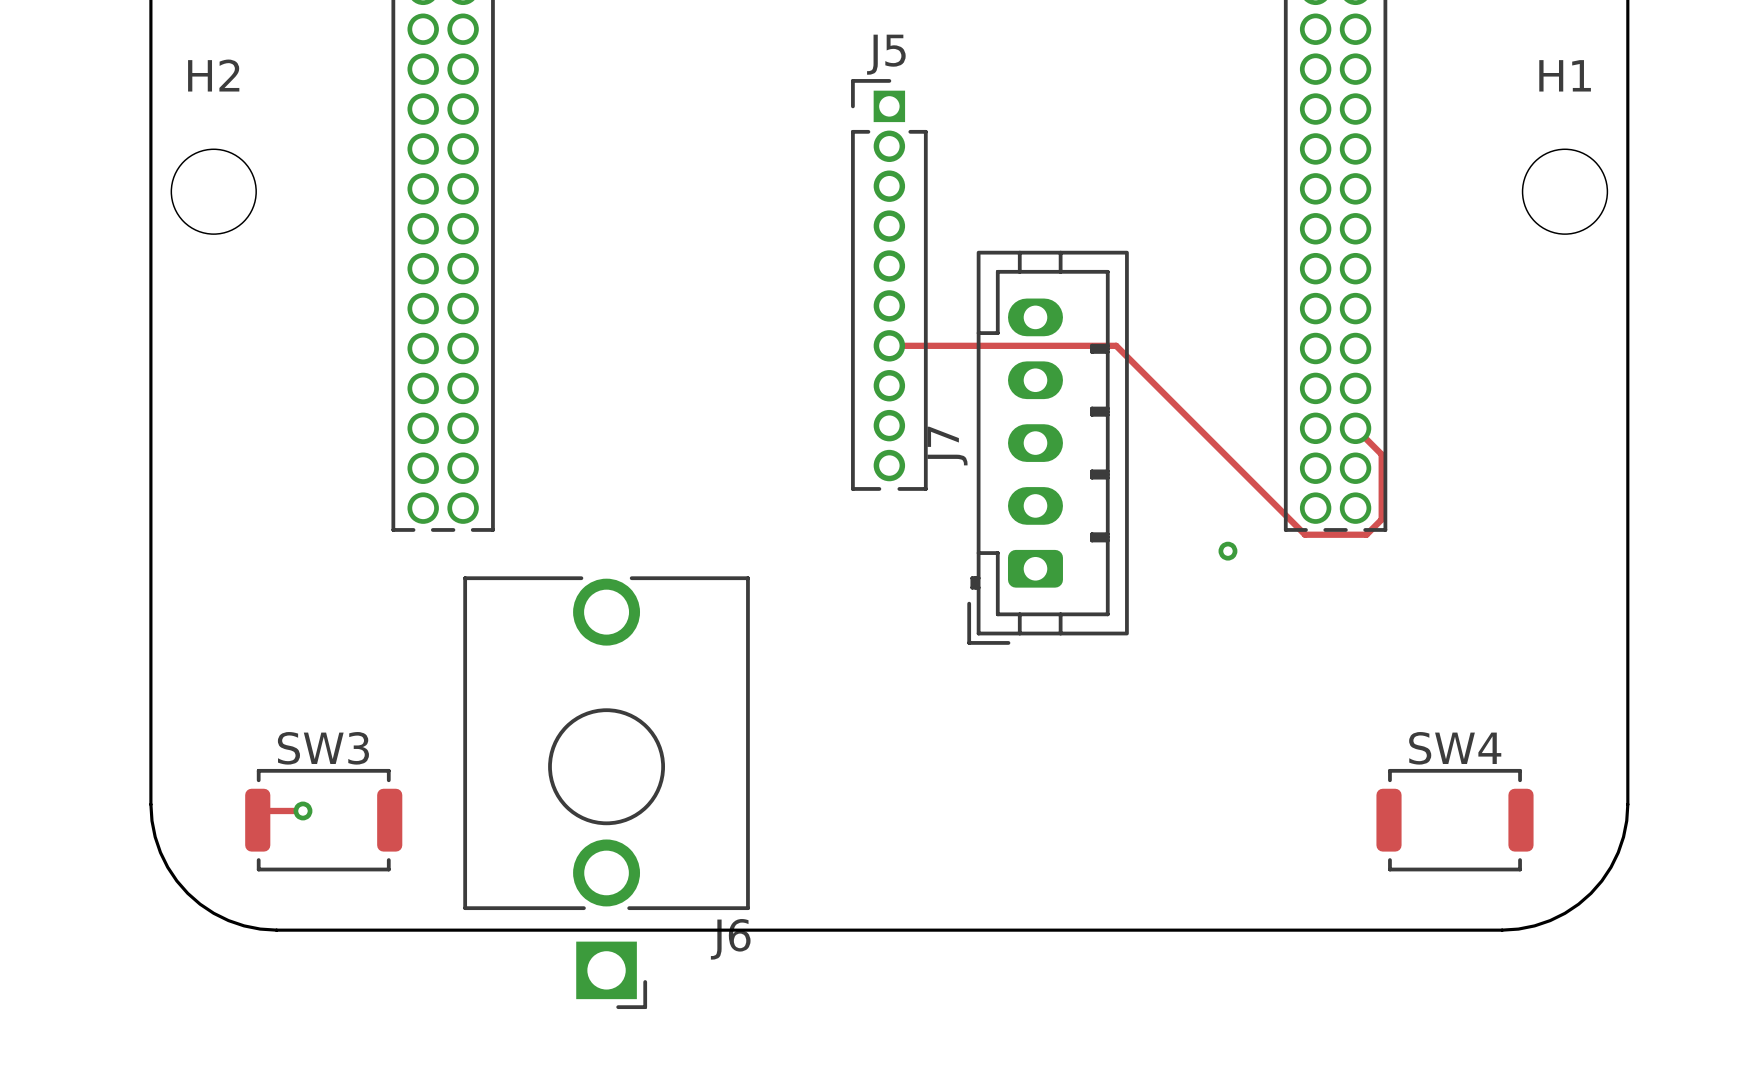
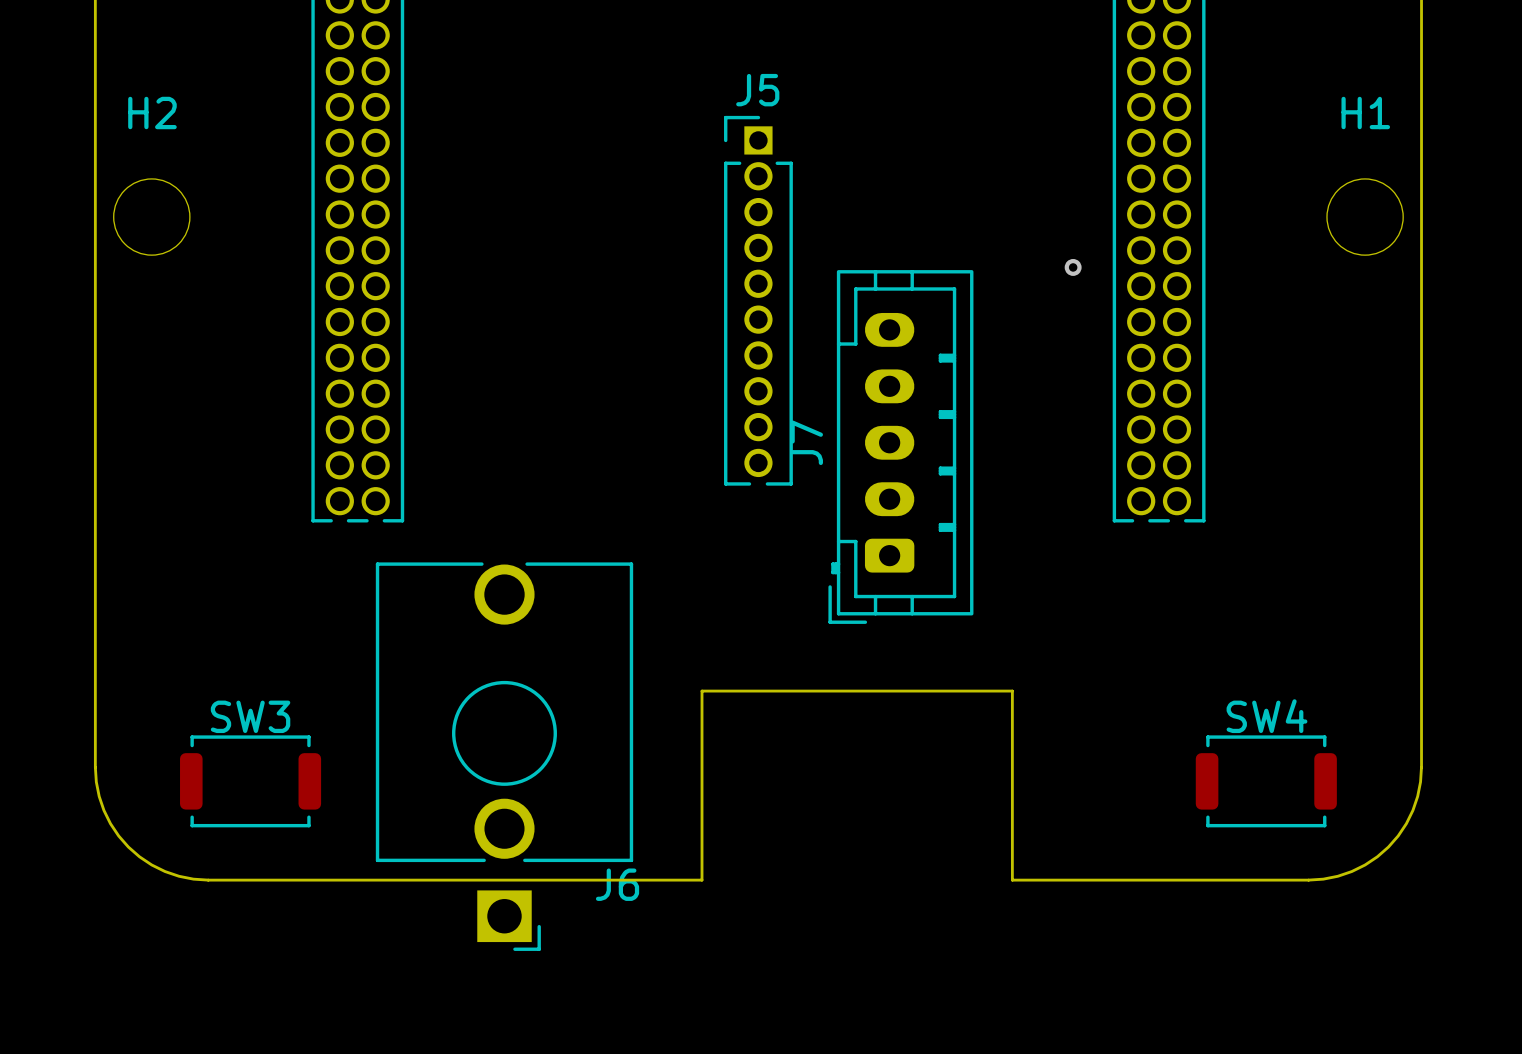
via: none -> (1073, 267)
track: (889, 345) (1116, 345) (1305, 534) (1366, 534) (1381, 519) (1381, 454) (1355, 428) -> none
via: (1227, 551) -> none
track: (302, 810) (266, 810) (257, 820) -> none
via: (302, 810) -> none
board edge: (826, 930) (1172, 930) -> (702, 880) (702, 691) (1012, 691) (1012, 880)

